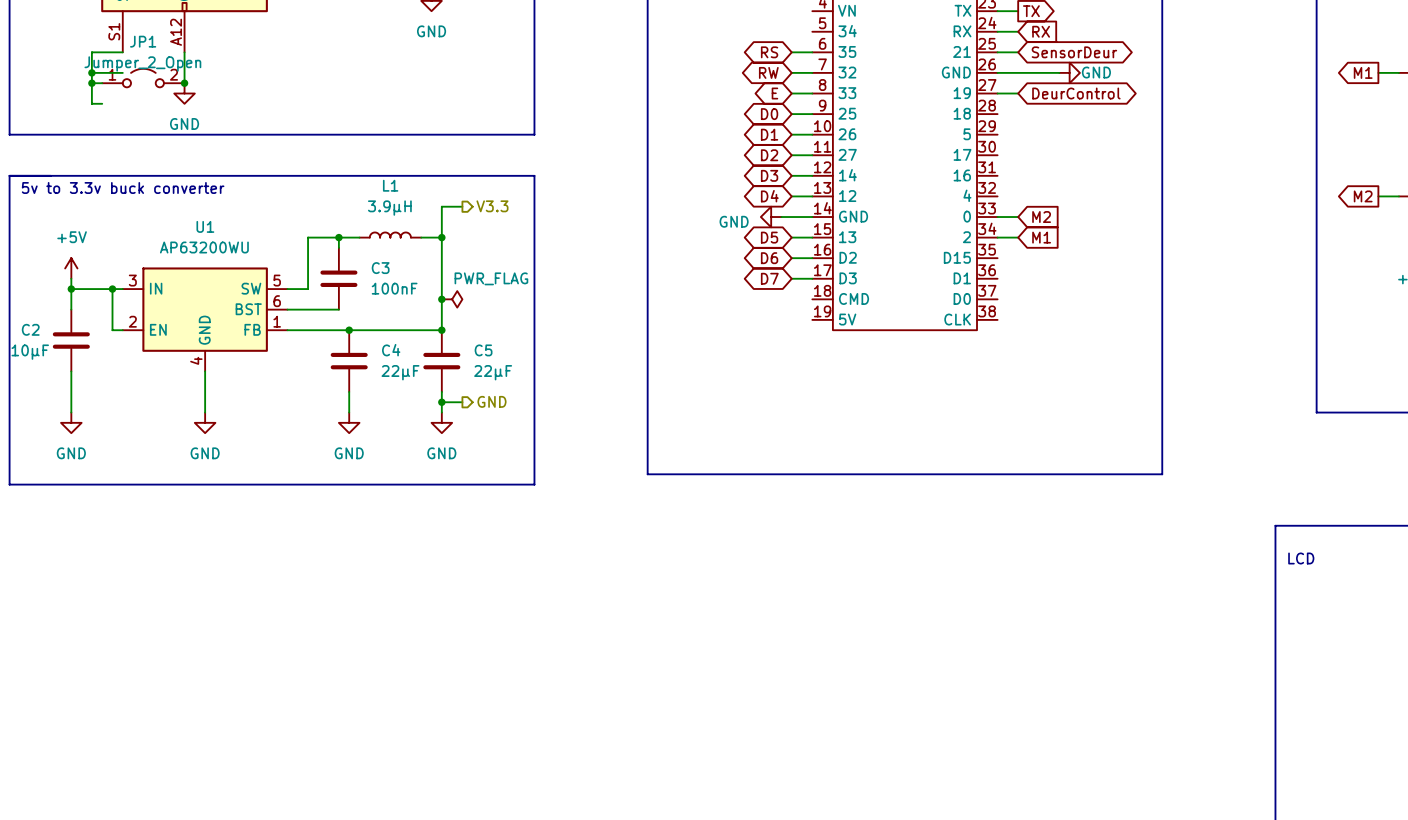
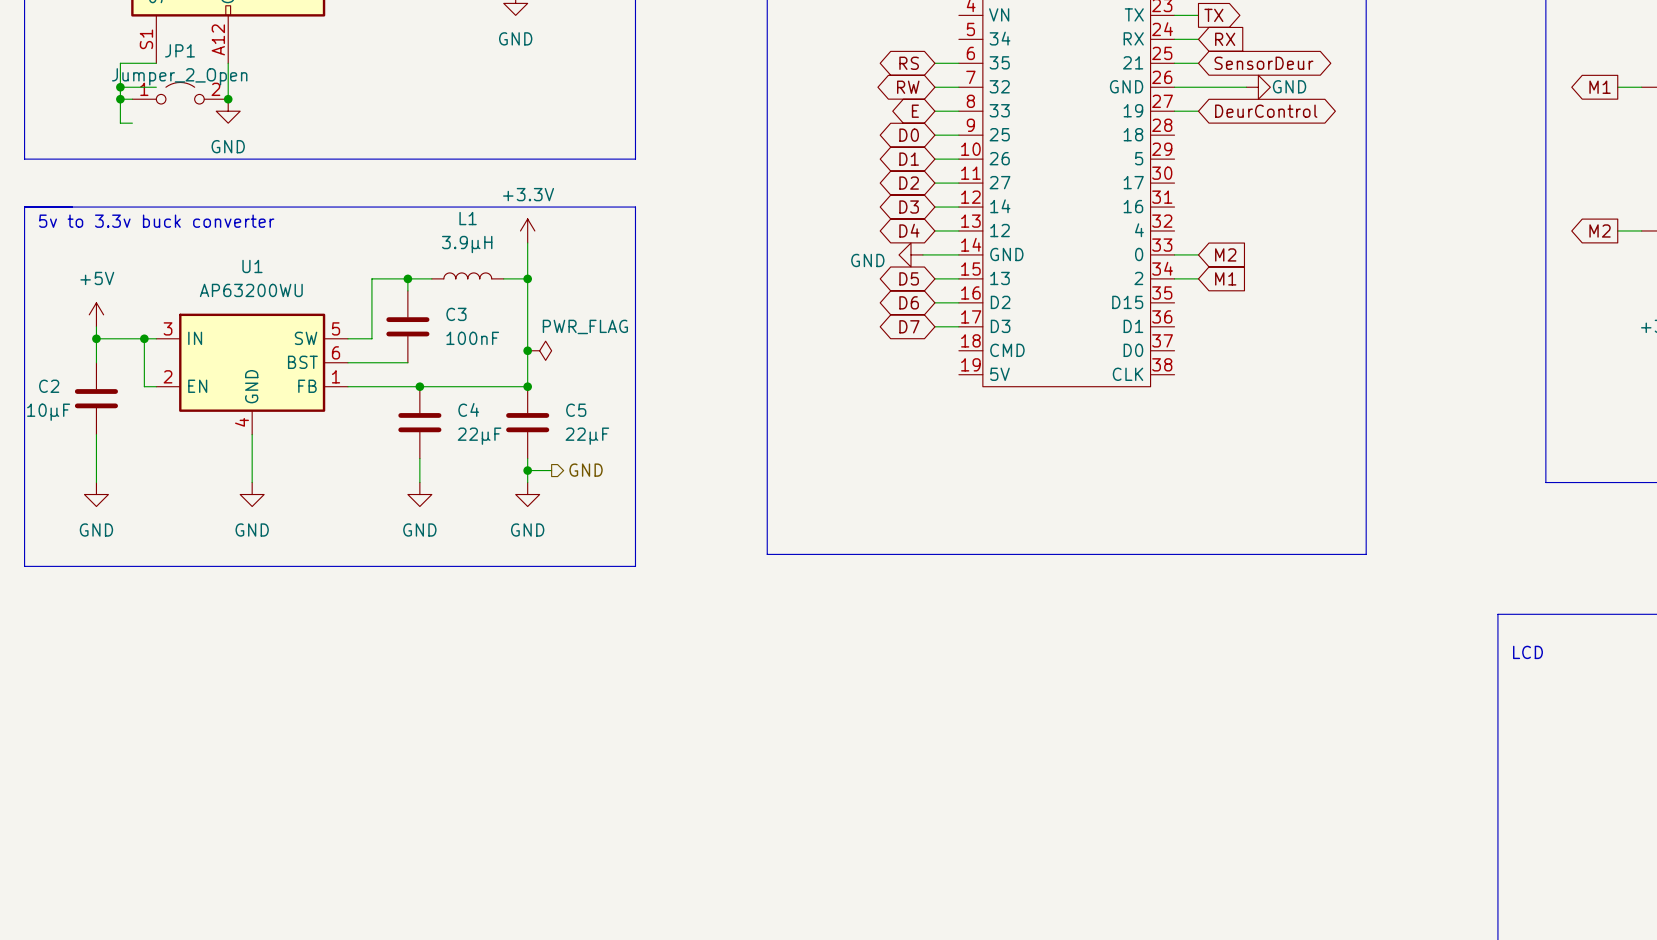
power symbol: none -> +3.3V (527, 230)
wire: (441, 206) (462, 206) -> none
hierarchical label: V3.3 (492, 206) -> none

